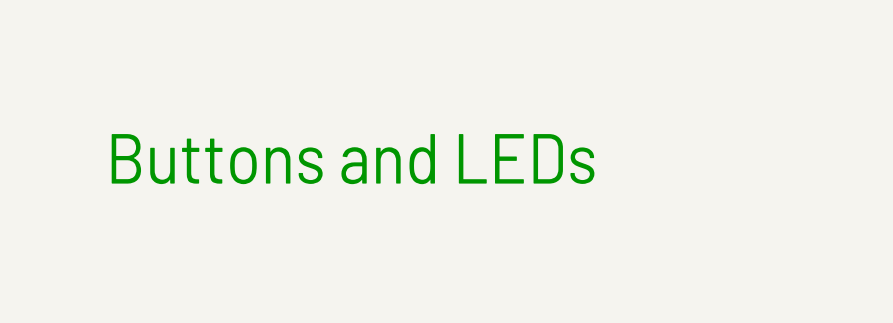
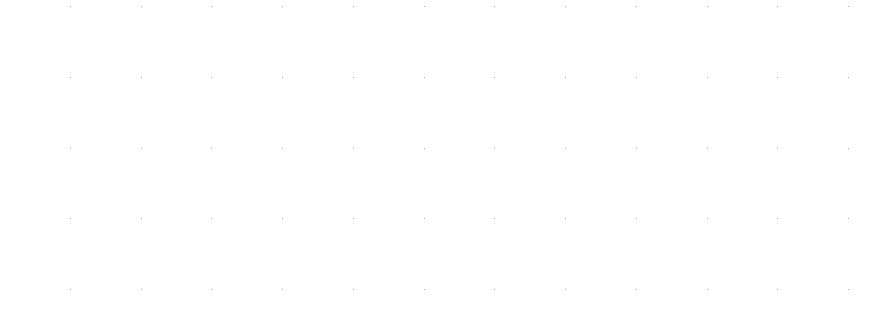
text: Buttons and LEDs (353, 159) -> none

